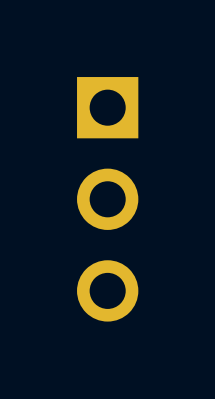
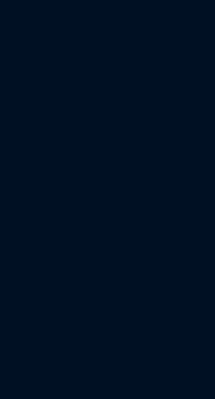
part: (107, 199) -> none

